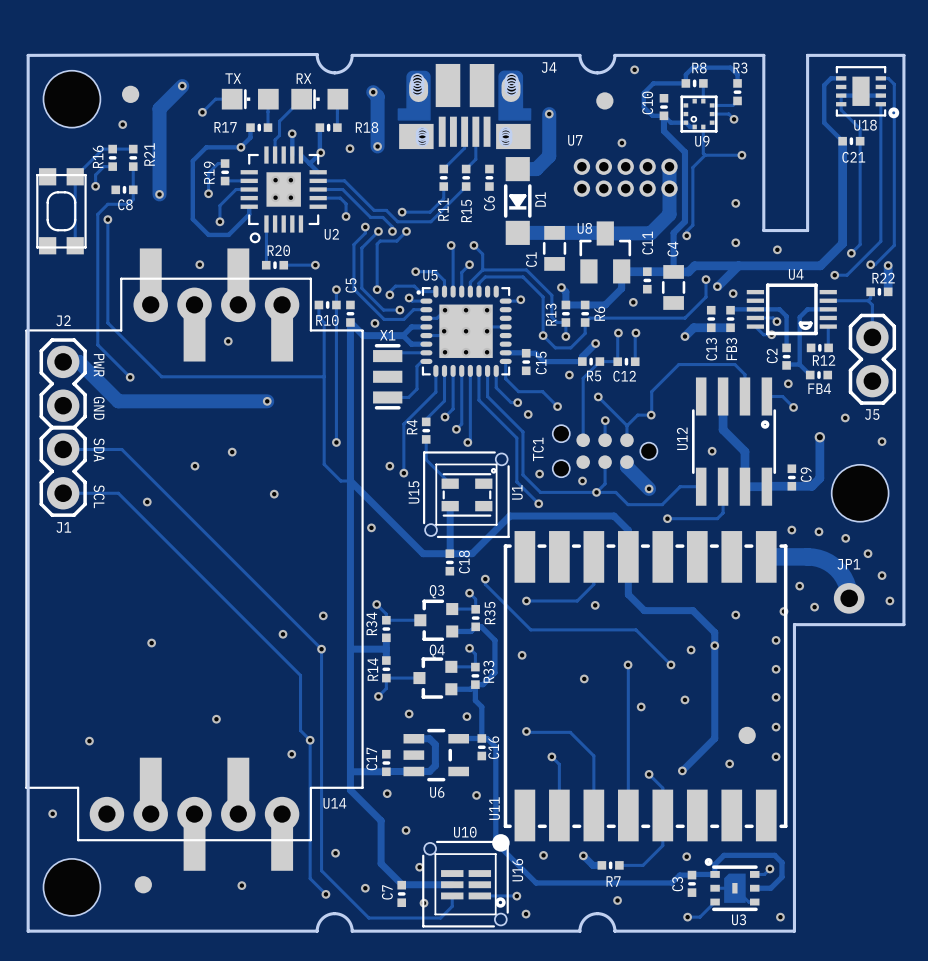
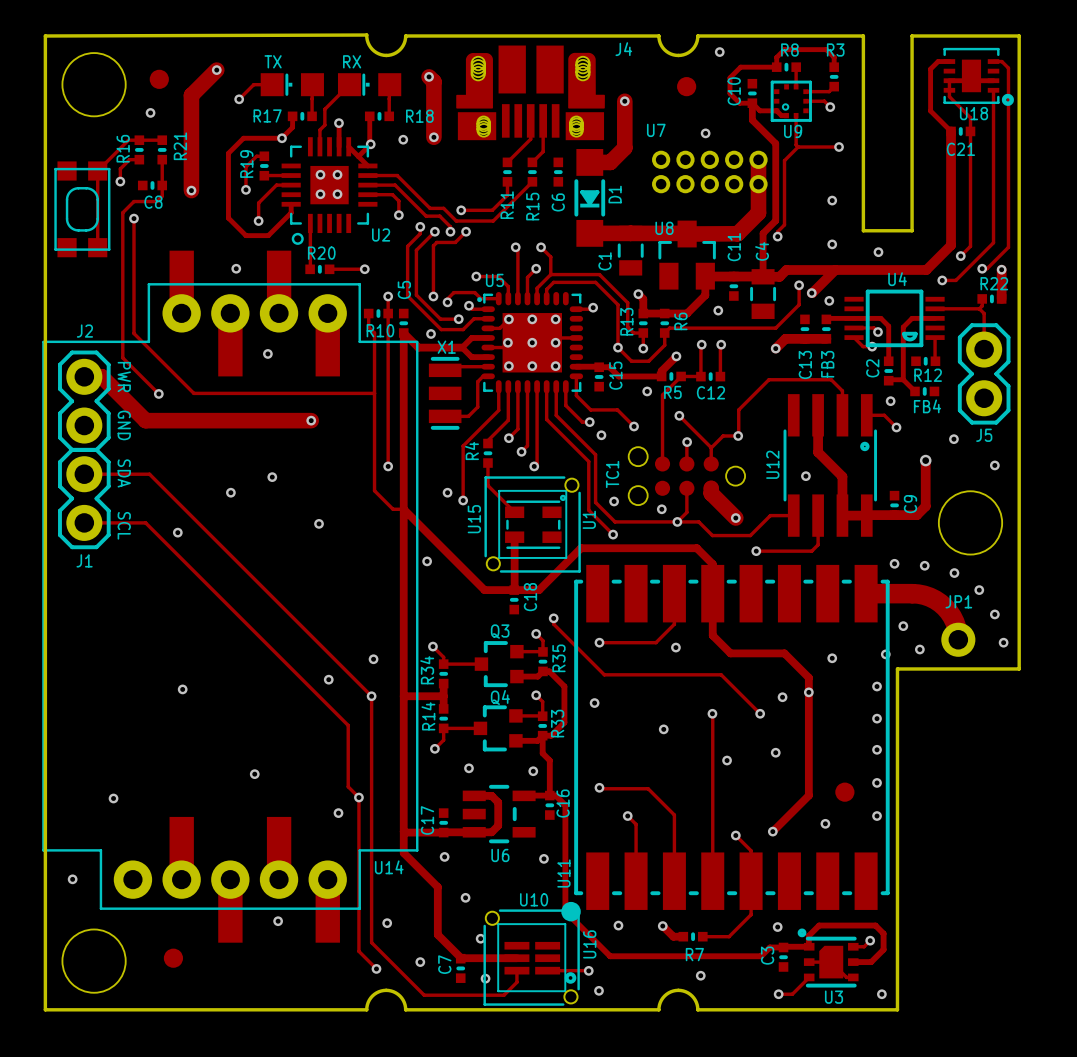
via position: (241, 885) -> (278, 921)

